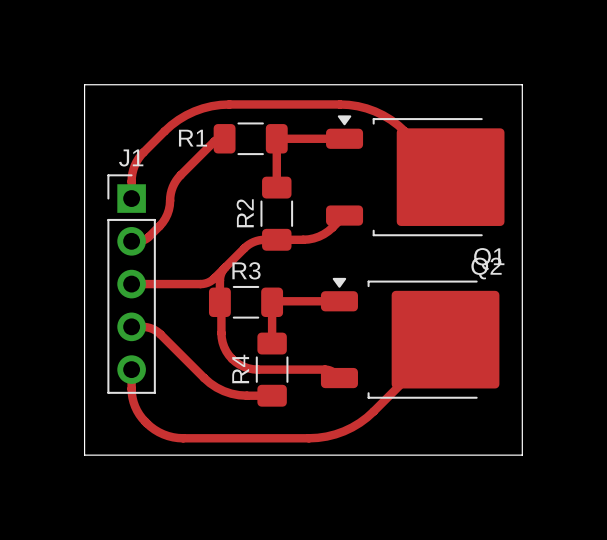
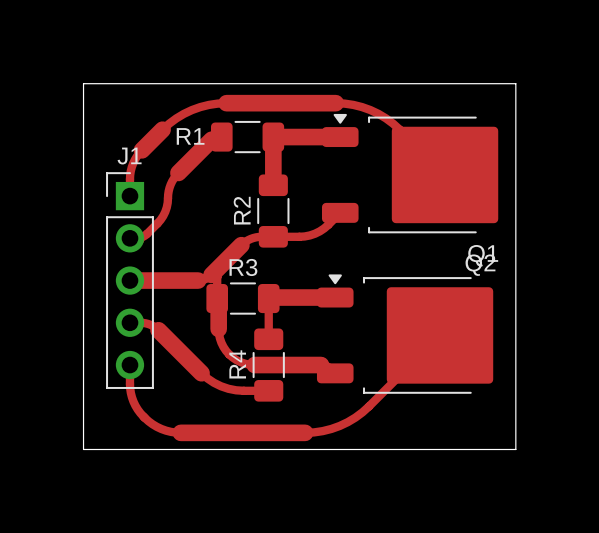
top track width: thin (229, 104) (339, 104) -> thick (226, 103) (335, 103)
top track width: thin (164, 131) (143, 152) -> thick (162, 129) (141, 150)
top track width: thin (344, 138) (276, 138) (276, 187) -> thick (340, 137) (273, 137) (273, 185)
top track width: thin (214, 141) (180, 175) -> thick (211, 139) (178, 172)
top track width: thin (244, 248) (214, 278) -> thick (241, 245) (211, 274)
top track width: thin (131, 284) (200, 284) -> thick (129, 280) (198, 280)
top track width: thin (273, 301) (339, 301) -> thick (270, 297) (335, 297)
top track width: thin (221, 304) (221, 333) -> thick (218, 301) (218, 328)
top track width: thin (160, 334) (204, 377) -> thick (158, 330) (201, 373)
top track width: thin (257, 369) (325, 369) -> thick (254, 365) (321, 365)
top track width: thin (183, 438) (308, 438) -> thick (180, 432) (305, 432)

